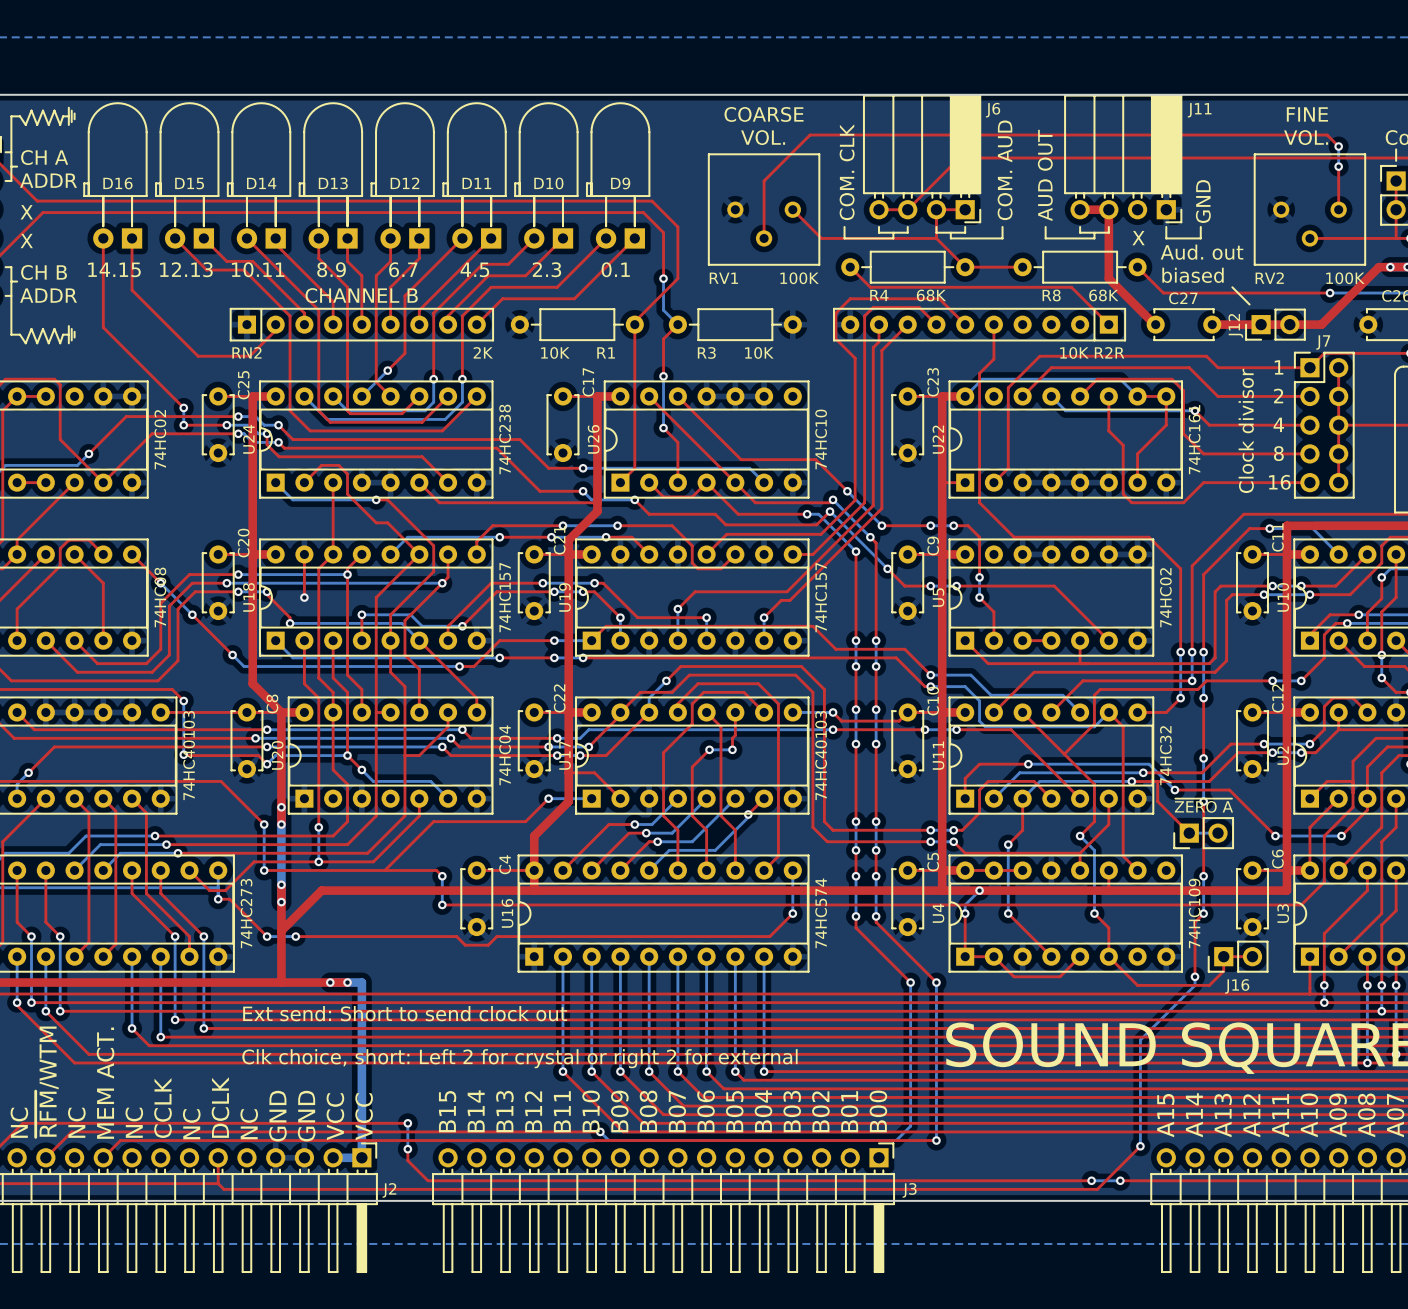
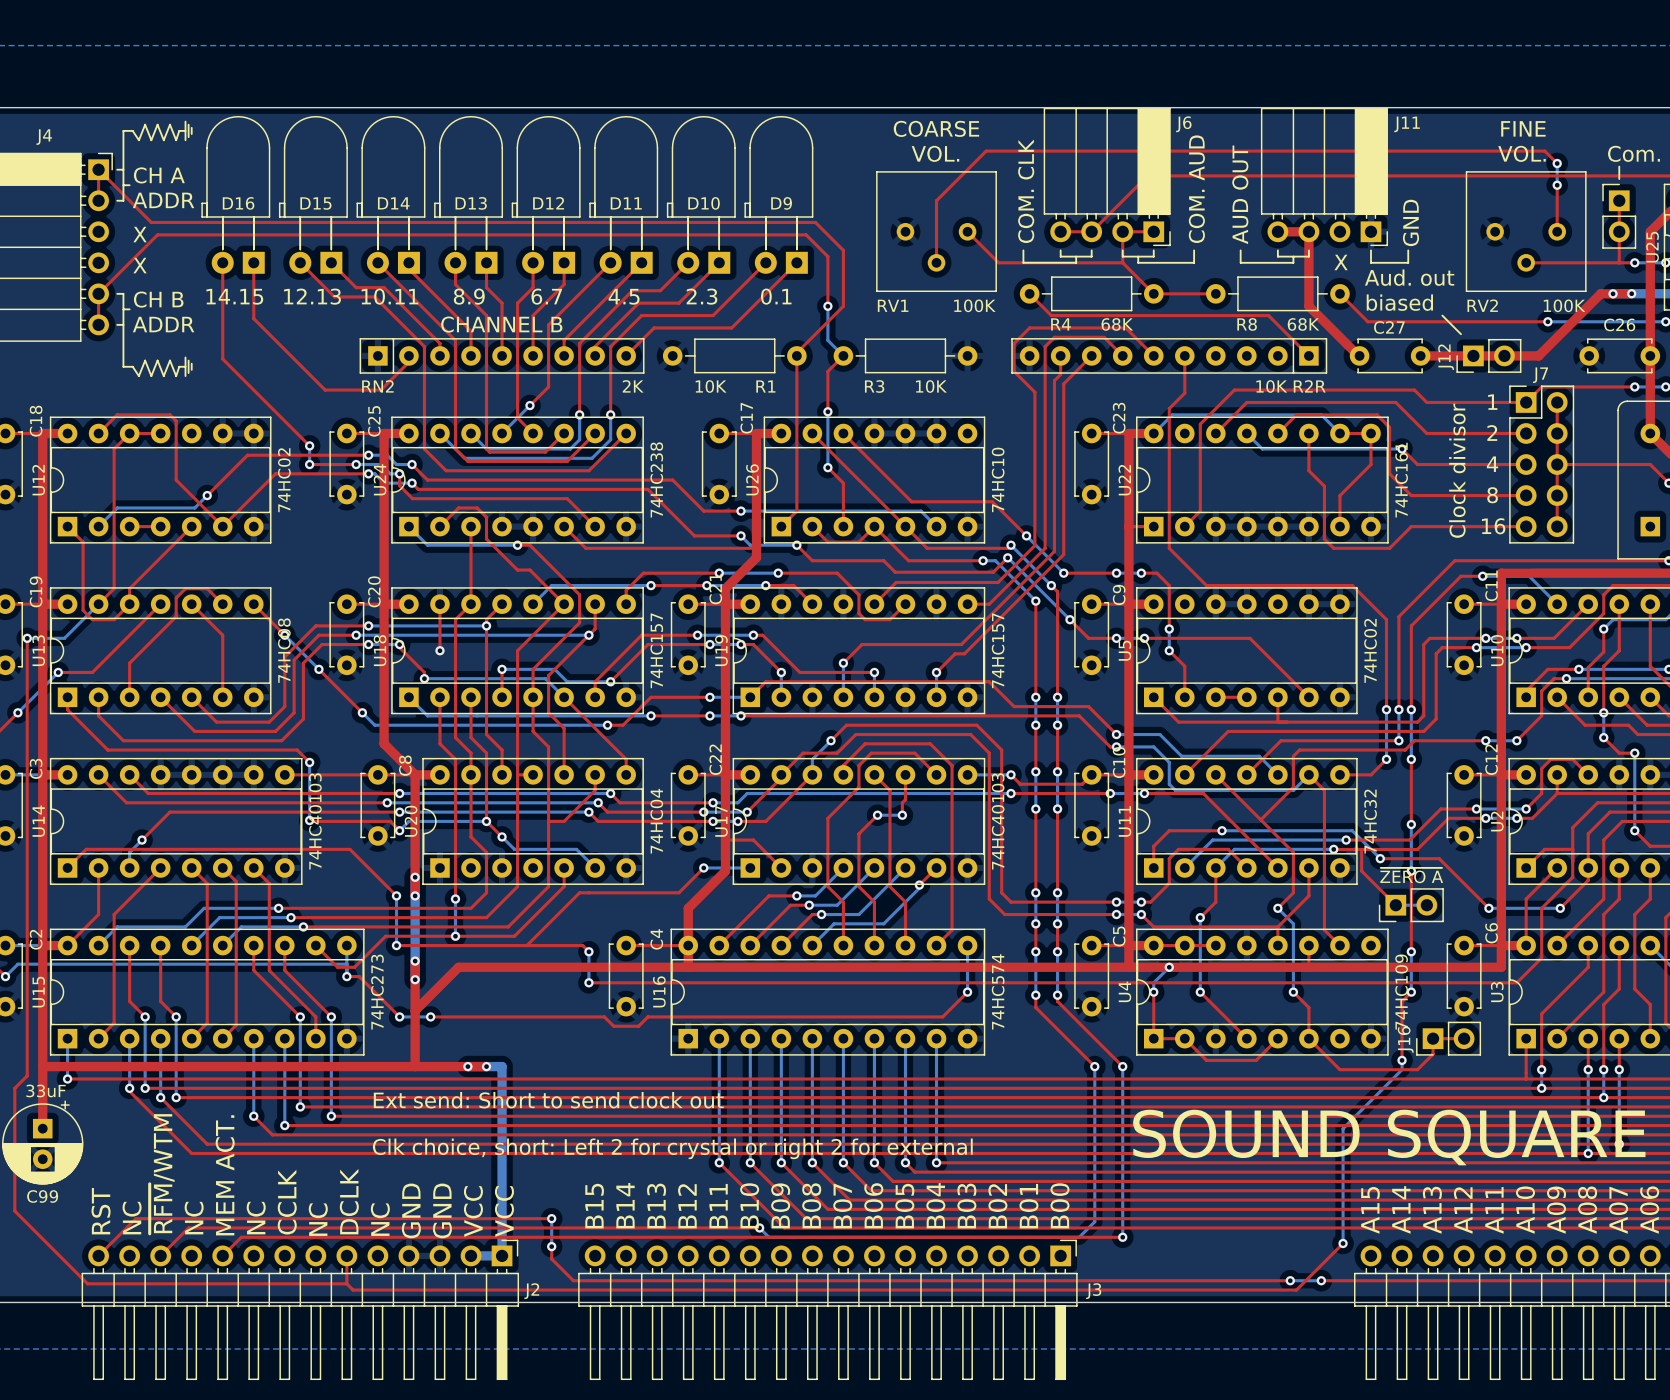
J16 name rotation: 0° (1237, 986) -> 90° counterclockwise (1405, 1039)
J16 name position: J16 (1237, 986) -> J16 (1405, 1039)

